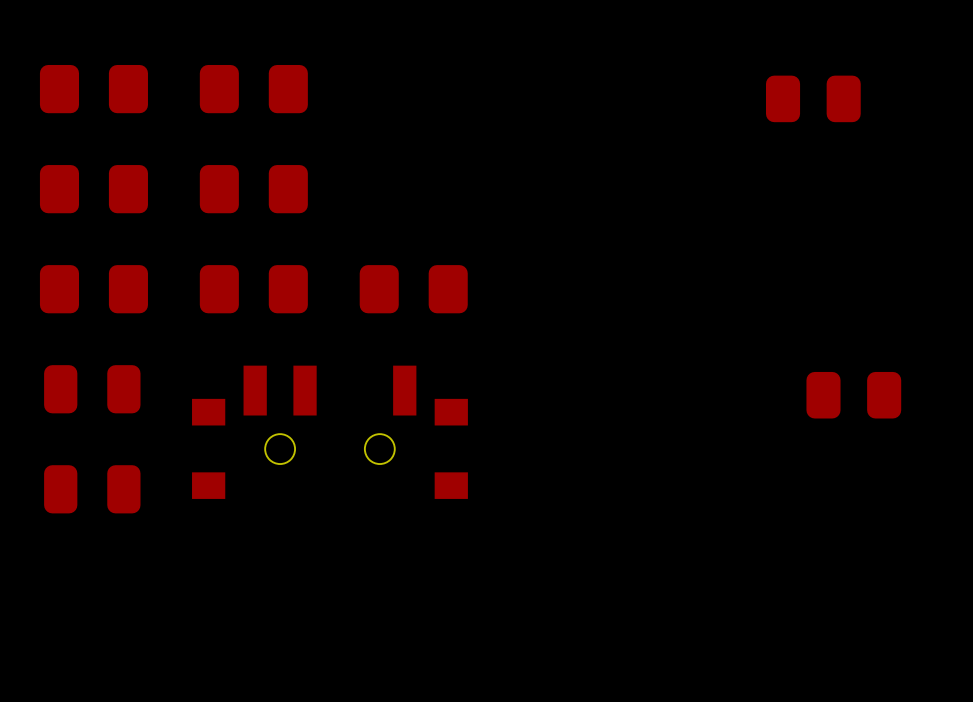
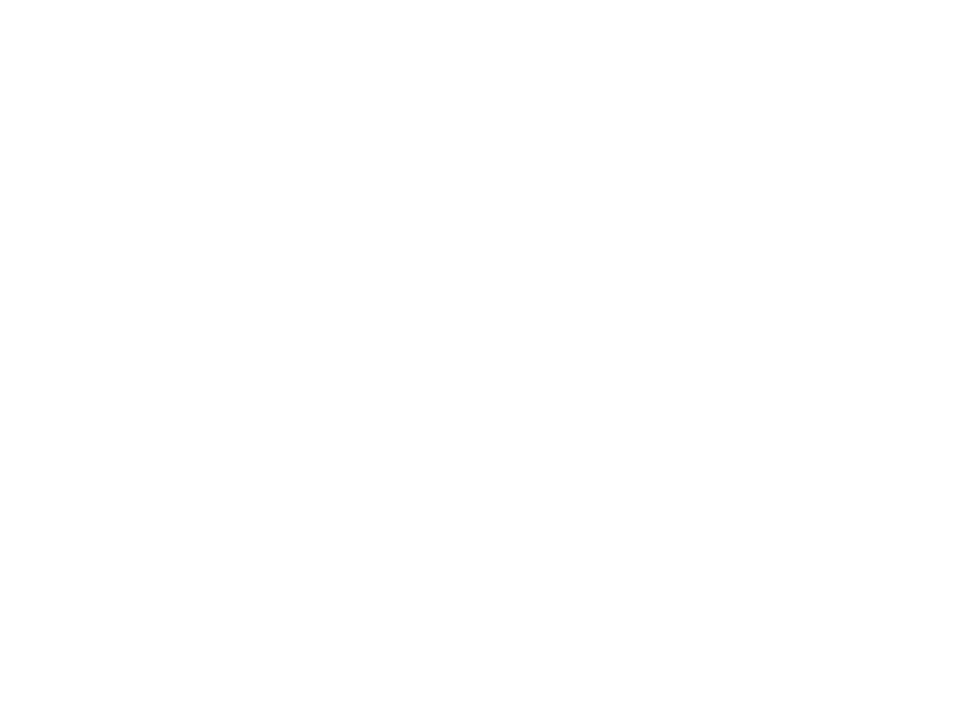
part: (93, 89) -> none
part: (253, 89) -> none
part: (813, 98) -> none
part: (93, 189) -> none
part: (253, 189) -> none
part: (93, 289) -> none
part: (253, 289) -> none
part: (413, 289) -> none
part: (92, 389) -> none
part: (853, 395) -> none
part: (329, 432) -> none
part: (92, 489) -> none

